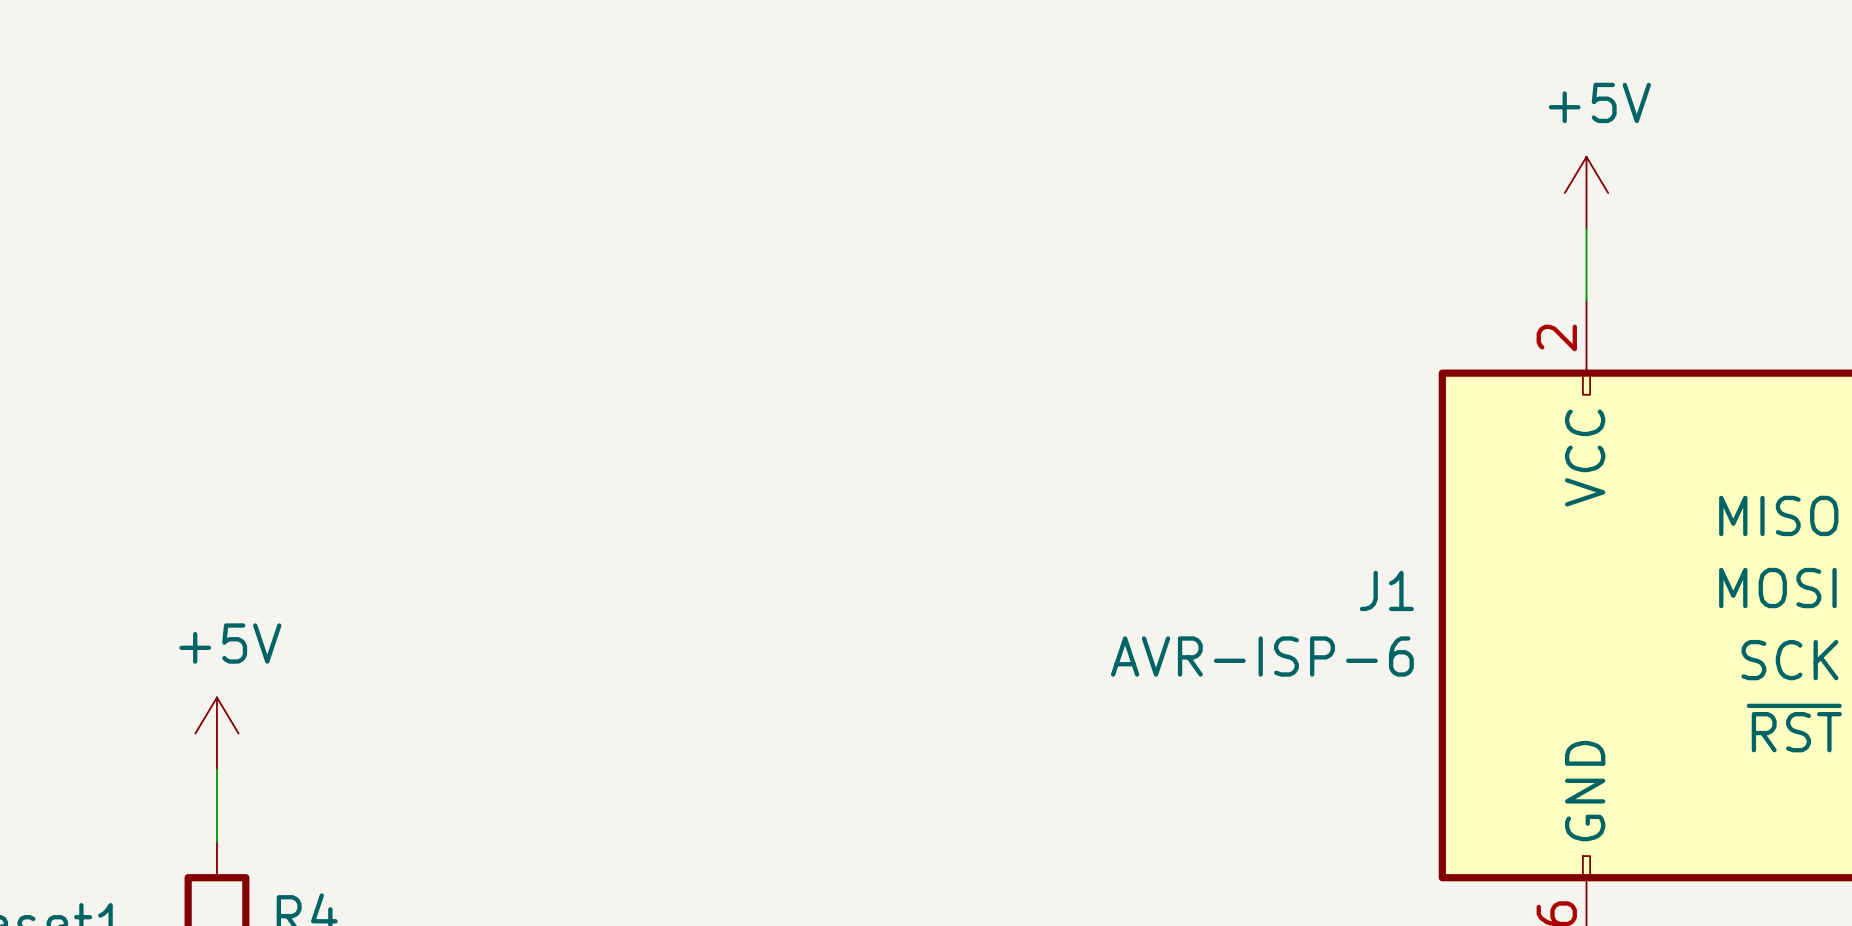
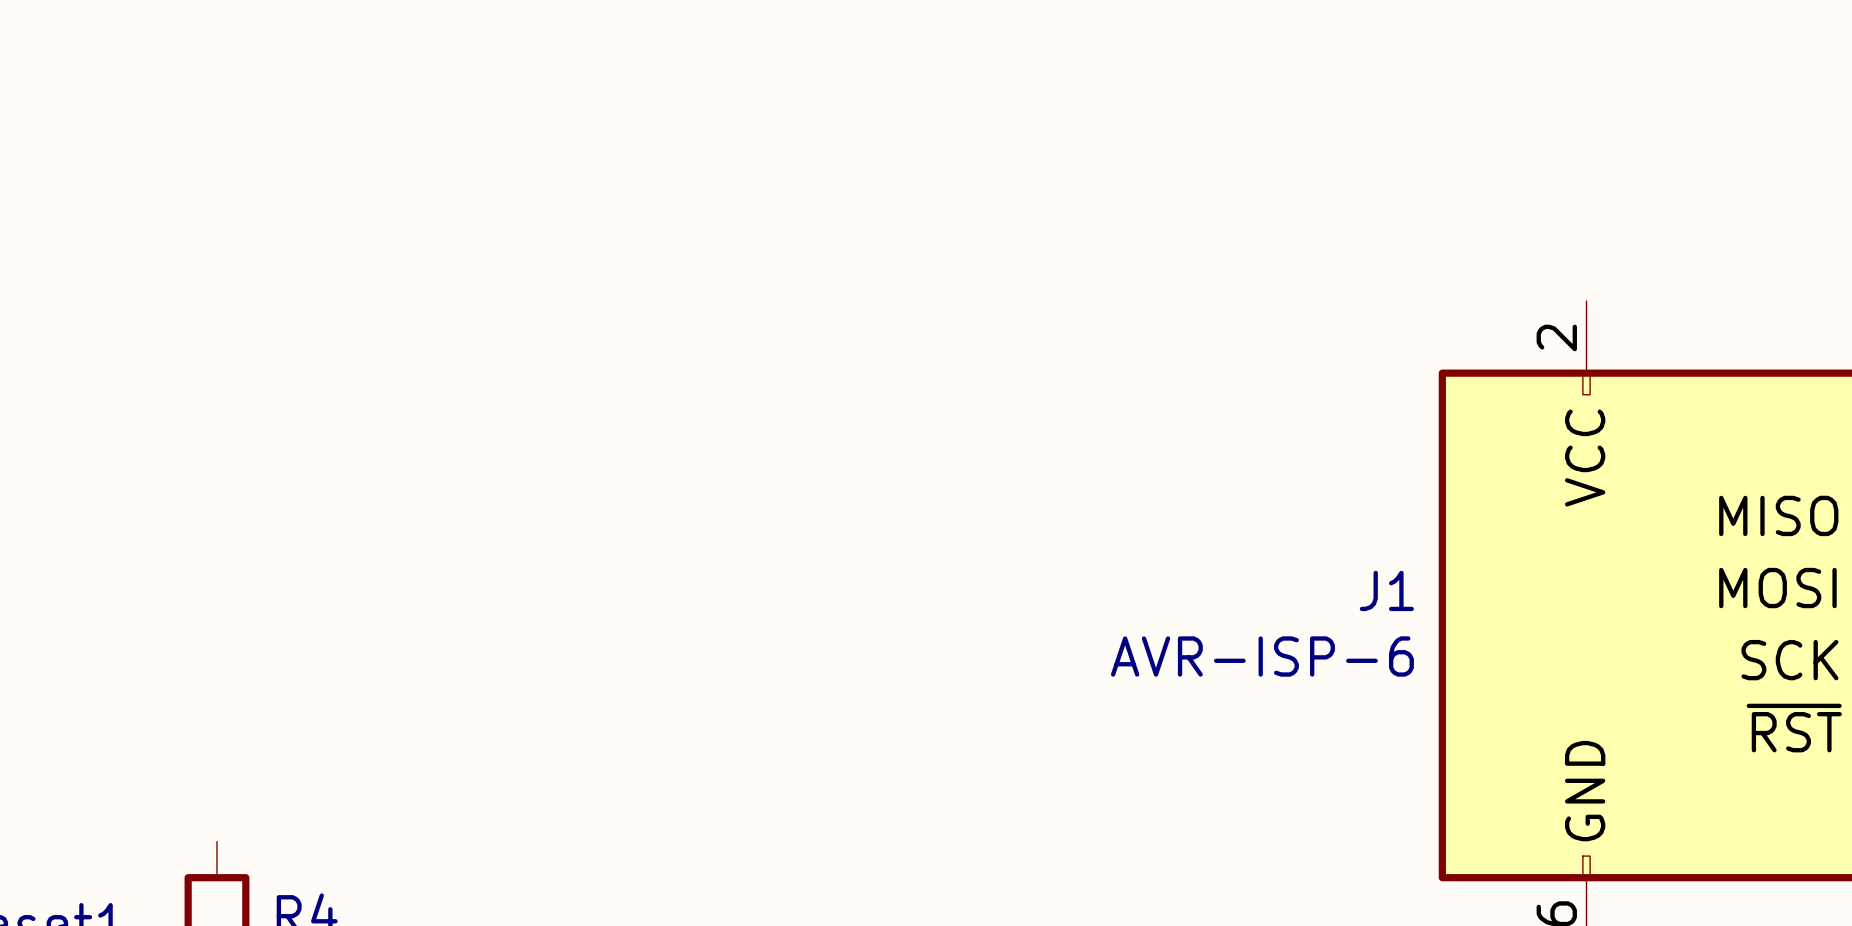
power symbol: +5V (1586, 192) -> none
wire: (1586, 228) (1586, 301) -> none
power symbol: +5V (216, 733) -> none
wire: (216, 769) (216, 841) -> none

